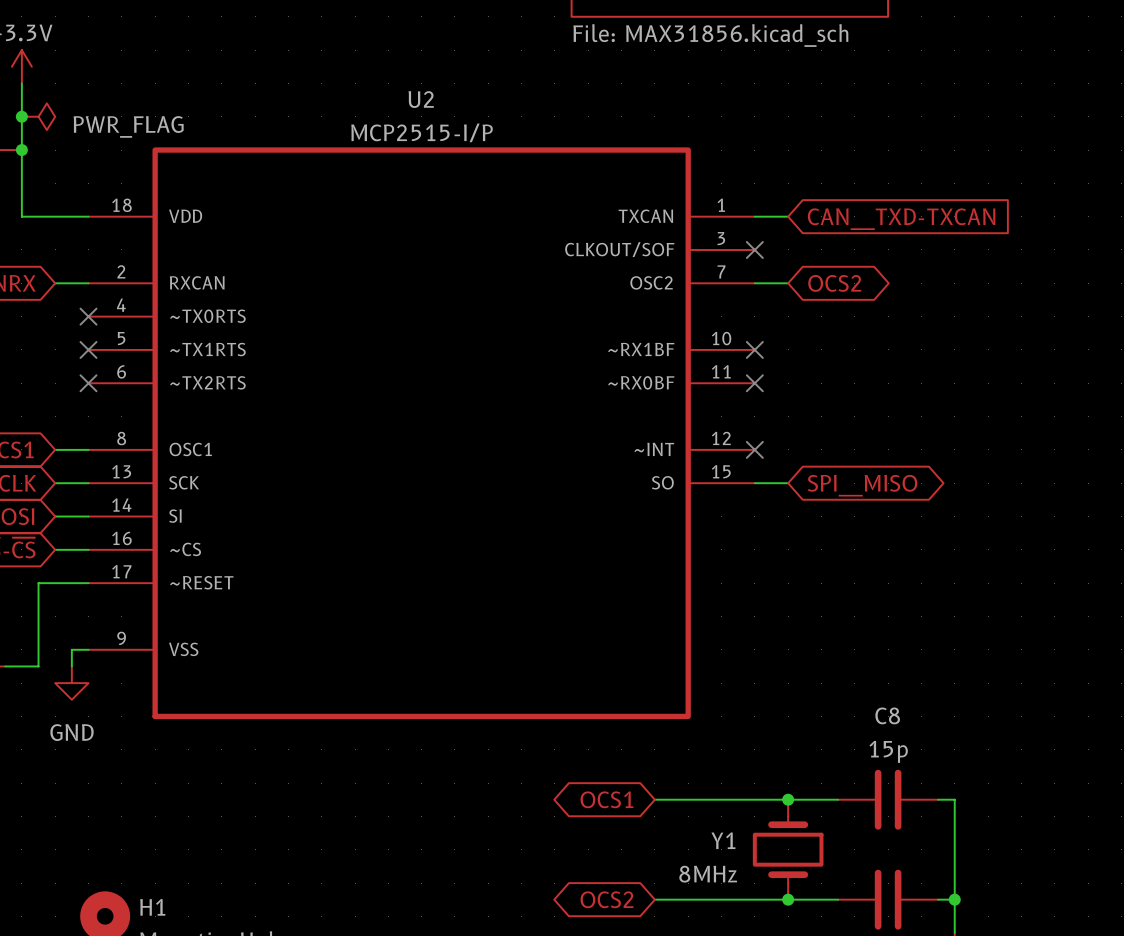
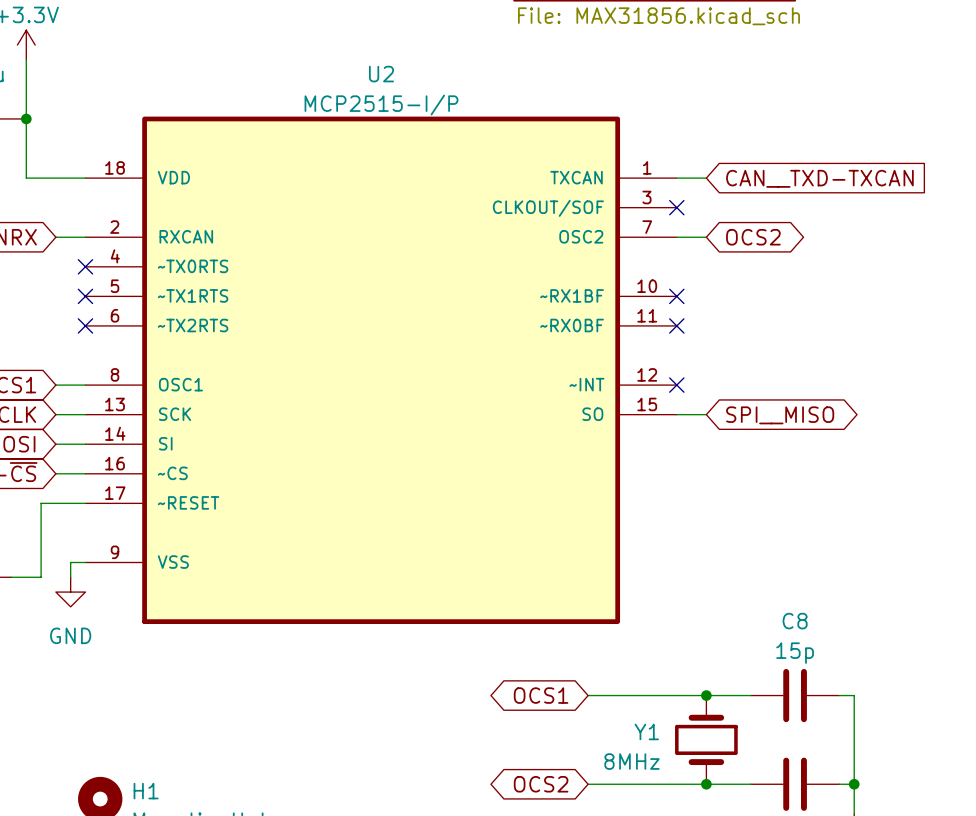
junction: (21, 116) -> none
power symbol: PWR_FLAG (38, 116) -> none

